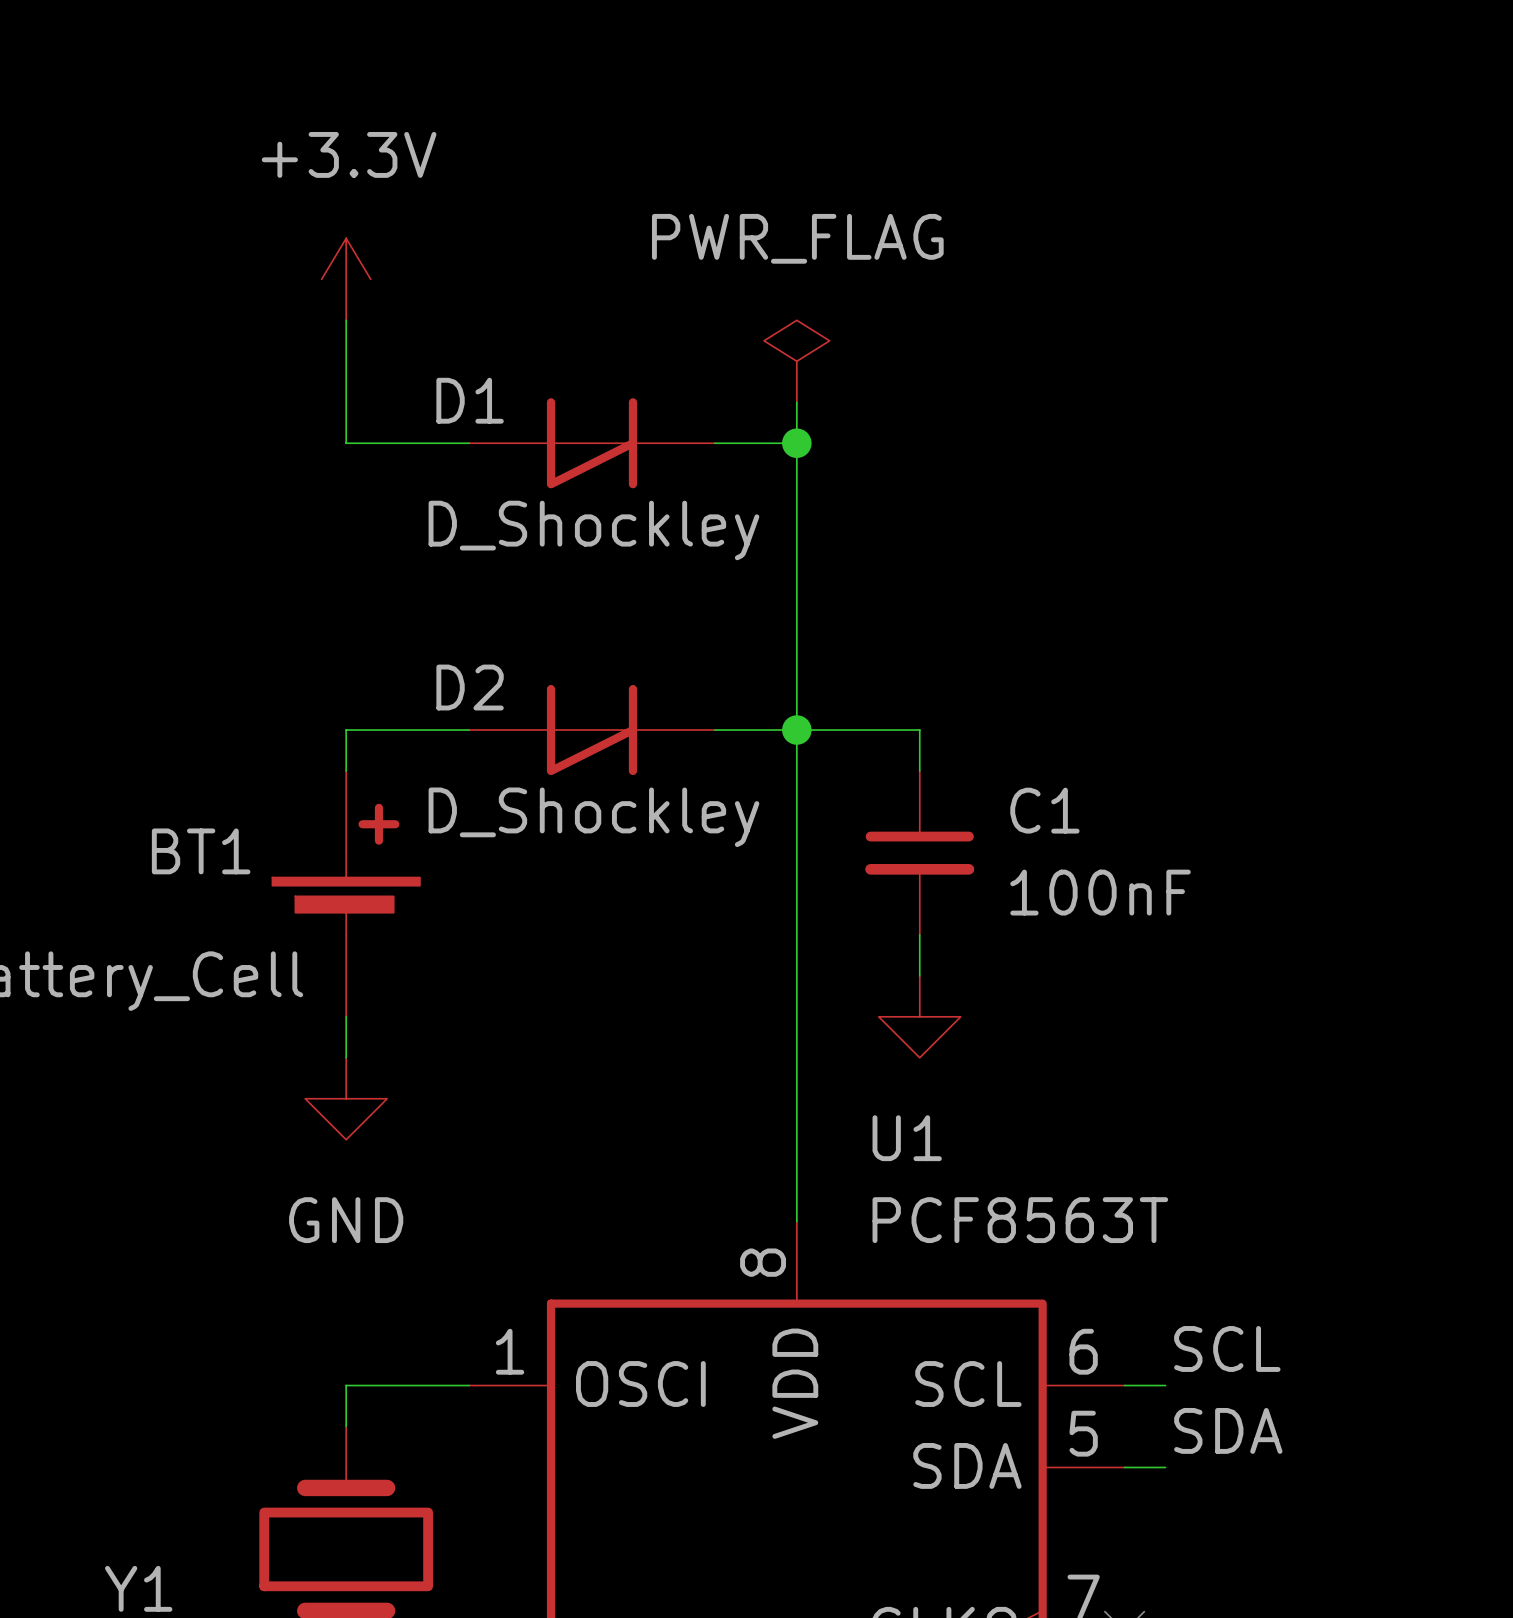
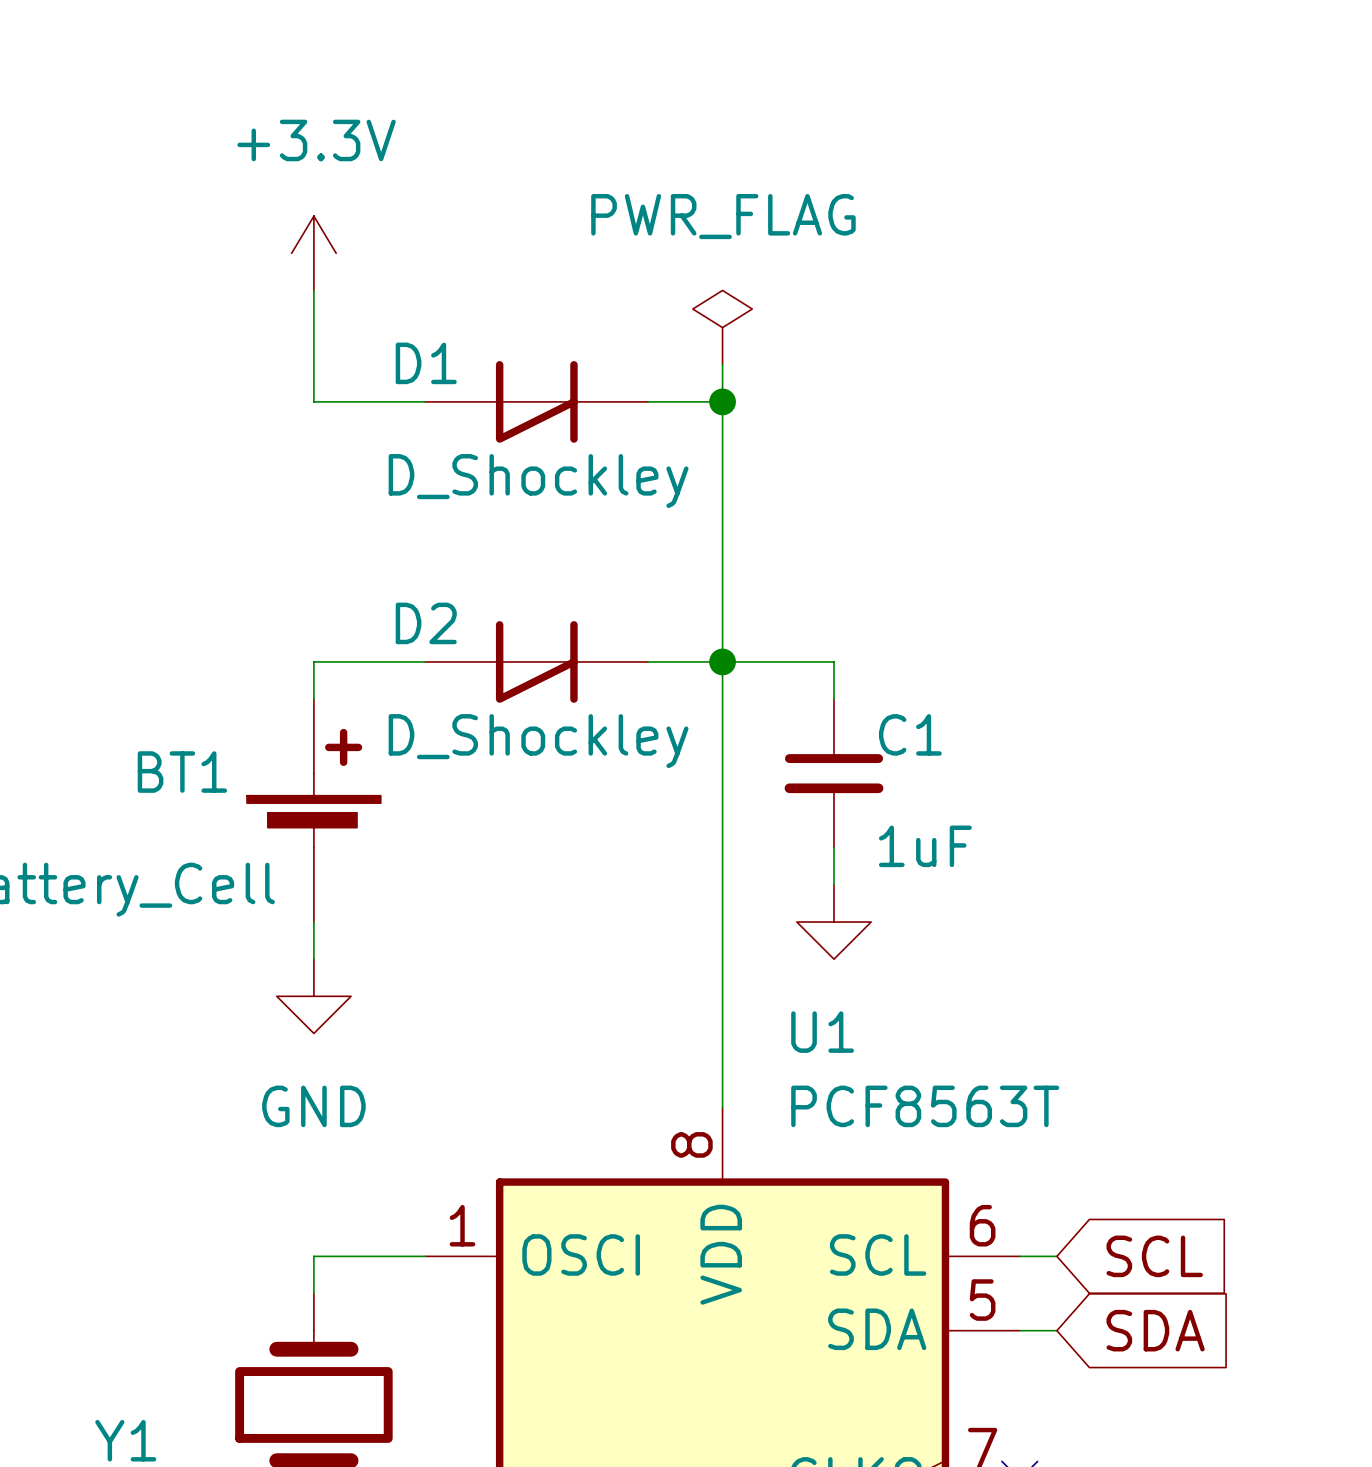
C1 name position: C1 (1044, 810) -> C1 (910, 734)
C1 value: 100nF (1100, 892) -> 1uF (925, 846)
label: SCL (1227, 1348) -> none
global label: none -> SCL (1154, 1256)
label: SDA (1228, 1430) -> none
global label: none -> SDA (1155, 1330)

